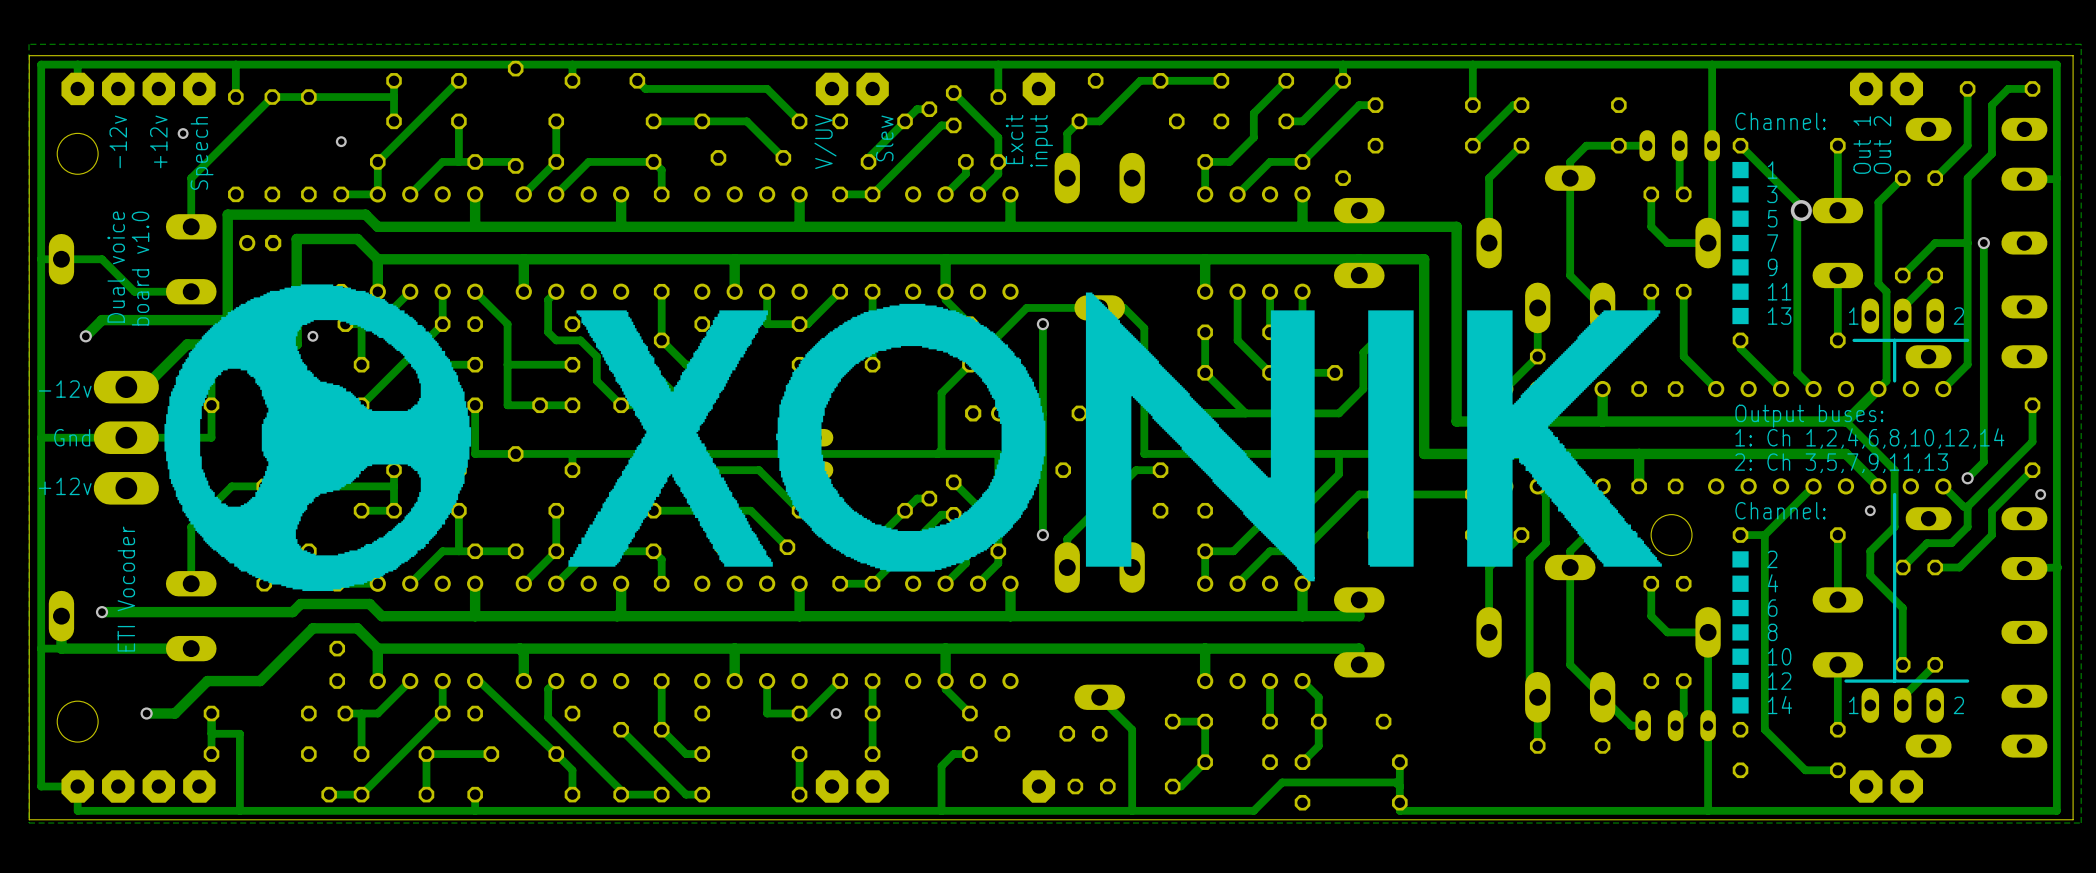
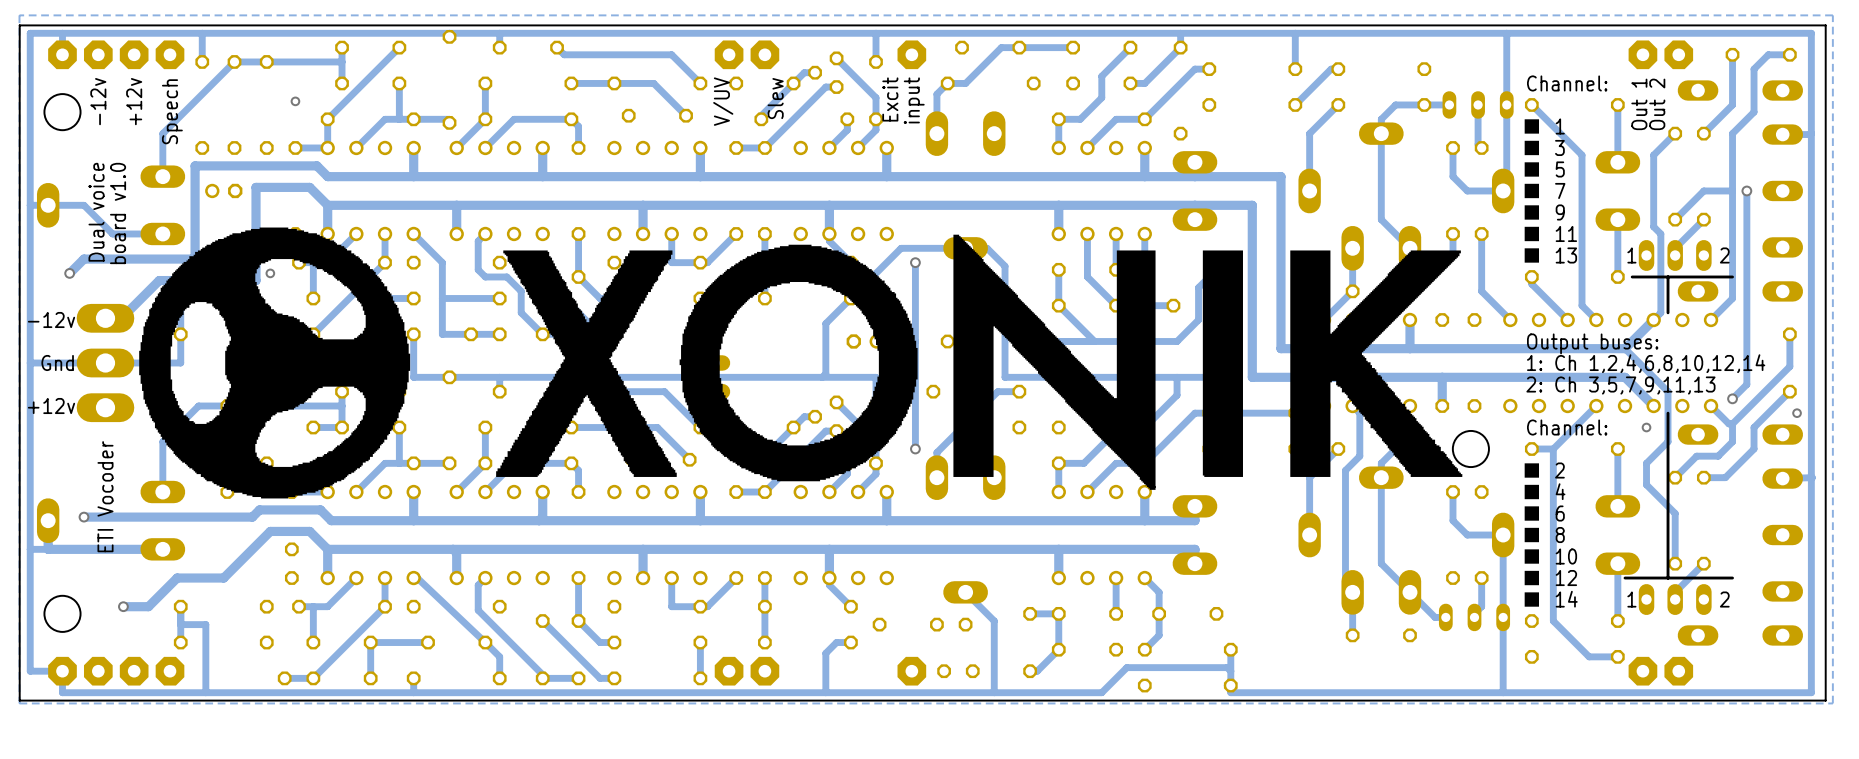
via: (183, 133) -> none
via: (1801, 210) -> none
via: (836, 713) -> none

